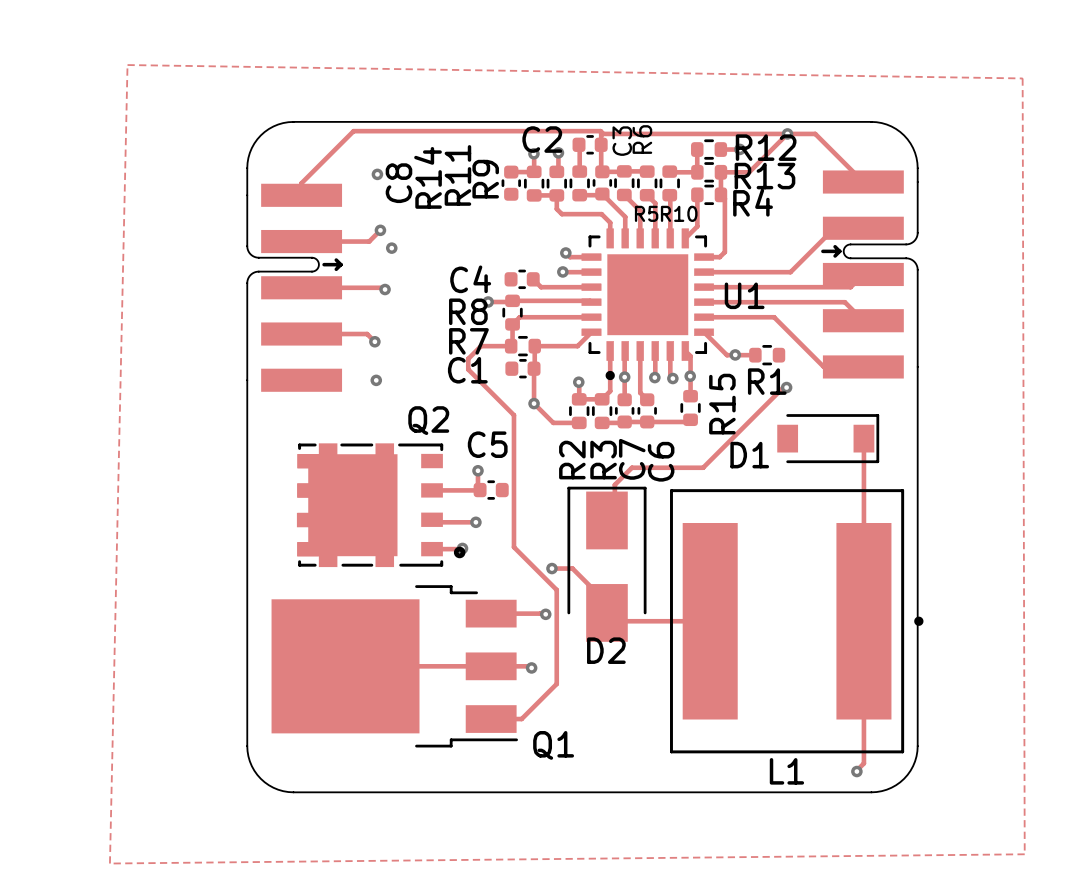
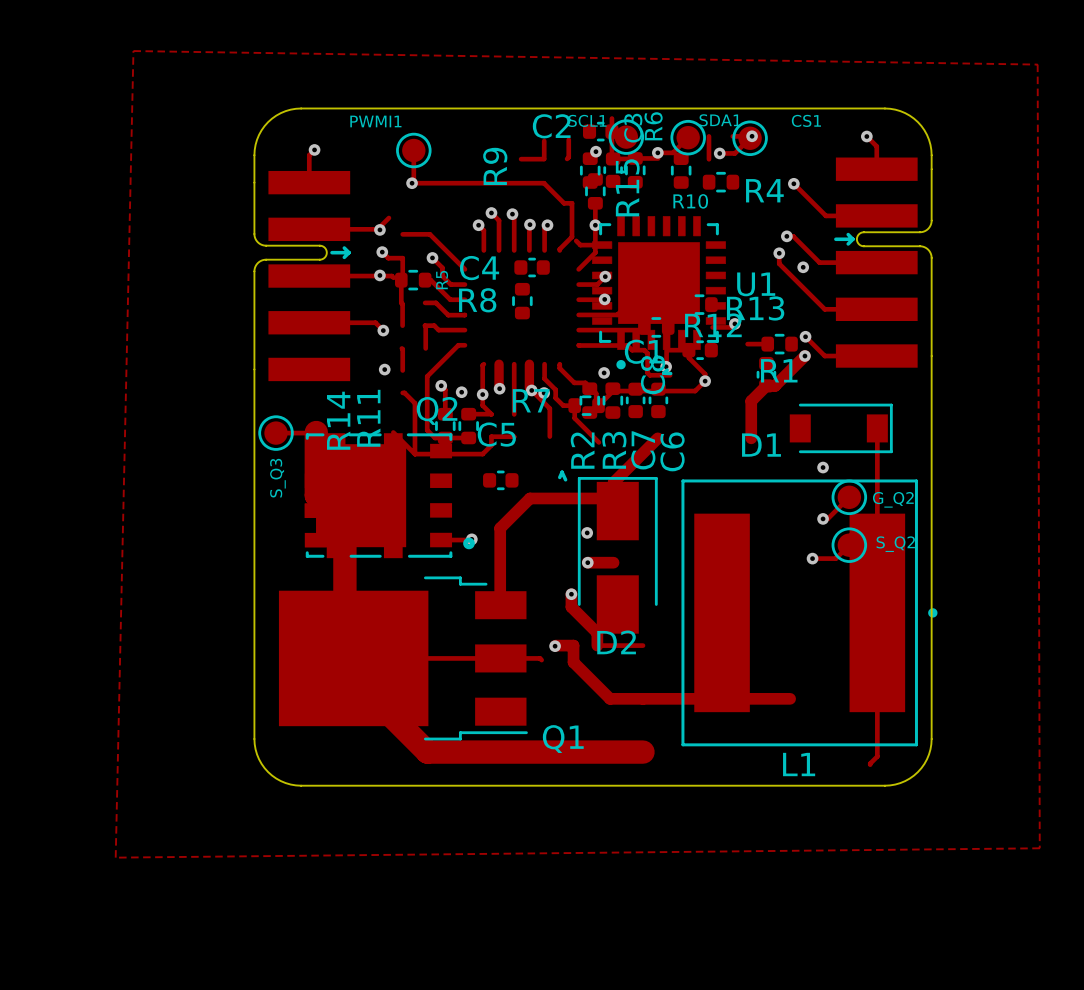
track: (787, 133) (749, 172) (720, 172) (720, 194) (724, 198) (724, 252) (719, 257) (704, 257) -> none
via: (787, 133) -> none
track: (579, 144) (579, 171) -> none
R12 position: (709, 149) -> (656, 327)
via: none -> (866, 136)
SCL1: none -> (626, 137)
track: none -> (688, 137) (673, 152) (657, 152)
SDA1: none -> (688, 137)
track: none -> (750, 138) (734, 153) (719, 153)
CS1: none -> (750, 138)
via: (558, 152) -> none
via: (533, 153) -> none
track: none -> (314, 149) (309, 155) (309, 170)
via: none -> (314, 149)
track: none -> (413, 150) (413, 181) (412, 183) (543, 183) (564, 203) (572, 203) (572, 236) (559, 250)
PWMI1: none -> (413, 150)
via: none -> (595, 151)
via: none -> (657, 152)
via: none -> (719, 153)
track: (669, 171) (697, 172) -> none
R13 position: (709, 172) -> (699, 304)
via: (377, 174) -> none
track: (863, 182) (815, 133) (353, 131) (301, 183) -> (876, 169) (876, 146) (866, 136)
C8 position: (511, 183) -> (766, 374)
R14 position: (534, 183) -> (445, 426)
R11 position: (556, 183) -> (468, 426)
R5 rotation: 0° (647, 183) -> 90° clockwise (413, 280)
R5 position: (647, 183) -> (413, 280)
track: (624, 194) (640, 210) (640, 238) -> none
track: (697, 194) (697, 226) (685, 238) -> none
via: none -> (412, 183)
track: (534, 195) (556, 195) (556, 209) (561, 214) (601, 214) (610, 222) (610, 238) -> none
track: (579, 195) (602, 194) (625, 216) (625, 238) -> none
track: (647, 195) (655, 203) (655, 238) -> none
track: (669, 195) (670, 238) -> none
via: none -> (793, 183)
track: none -> (595, 203) (595, 252) (578, 269)
track: none -> (491, 212) (499, 220) (499, 250)
via: none -> (491, 212)
track: none -> (512, 214) (514, 215) (514, 250)
via: none -> (512, 214)
track: (834, 228) (790, 272) (704, 272) -> (847, 215) (825, 215) (793, 183)
via: (380, 230) -> none
track: none -> (529, 224) (529, 250)
via: none -> (529, 224)
track: none -> (478, 225) (483, 230) (483, 250)
via: none -> (478, 225)
track: none -> (547, 225) (544, 228) (544, 250)
via: none -> (547, 225)
via: none -> (595, 225)
via: none -> (379, 229)
track: none -> (402, 234) (429, 234) (464, 269)
via: (391, 248) -> none
via: none -> (786, 236)
via: (565, 252) -> none
track: none -> (382, 252) (388, 258) (402, 258) (402, 325)
via: none -> (382, 252)
via: none -> (779, 253)
track: none -> (432, 257) (442, 267) (442, 276) (450, 284) (464, 284)
via: none -> (432, 257)
via: (562, 271) -> none
track: (563, 272) (591, 272) -> none
track: (863, 274) (850, 287) (704, 287) -> (876, 262) (819, 262) (793, 236) (786, 236)
track: (533, 279) (541, 287) (591, 287) -> none
via: none -> (803, 267)
via: none -> (379, 275)
track: none -> (605, 276) (597, 284) (578, 284)
via: none -> (605, 276)
via: (385, 289) -> none
track: none -> (425, 280) (430, 280) (450, 299) (464, 299)
track: (488, 301) (591, 302) -> none
via: (488, 301) -> none
track: (704, 302) (844, 302) (863, 320) -> (779, 253) (779, 263) (824, 309) (876, 309)
track: none -> (604, 299) (578, 299)
via: none -> (604, 299)
track: none -> (425, 302) (435, 302) (448, 315) (464, 315)
track: none -> (644, 304) (644, 327) (641, 330) (578, 330)
track: (591, 317) (519, 317) (512, 324) (511, 346) (480, 346) (468, 358) (468, 369) (513, 415) (513, 547) (556, 589) (556, 683) (521, 719) (491, 719) -> none
track: (704, 317) (774, 317) (823, 366) -> (805, 336) (824, 356) (836, 356)
track: none -> (622, 309) (617, 314) (578, 314)
track: (591, 332) (577, 346) (534, 346) (534, 403) (553, 422) (579, 422) -> none
track: (704, 332) (726, 355) (735, 355) -> none
track: none -> (734, 323) (731, 327) (712, 327)
track: none -> (464, 330) (438, 330) (434, 325) (425, 325) (425, 348)
R7 position: (522, 346) -> (586, 405)
via: none -> (805, 336)
track: (610, 351) (610, 391) (602, 399) (579, 399) (578, 382) -> none
track: (625, 351) (624, 399) -> none
track: (640, 351) (640, 392) (647, 399) -> none
track: (670, 351) (670, 375) (672, 378) -> none
track: (685, 351) (690, 356) (690, 396) -> none
via position: (735, 354) -> (734, 323)
track: none -> (464, 345) (458, 345) (427, 376) (427, 430) (435, 437) (468, 437)
track: none -> (578, 345) (627, 345) (632, 350) (644, 350) (647, 353) (647, 372) (649, 375) (670, 375)
track: none -> (401, 348) (402, 370)
track: none -> (668, 350) (688, 350) (688, 357) (705, 374) (705, 381) (695, 391) (613, 391) (598, 405)
track: none -> (804, 356) (775, 385) (766, 385) (751, 401) (751, 438)
via: none -> (804, 356)
C1 position: (522, 368) -> (700, 350)
track: none -> (483, 364) (482, 405) (491, 414) (468, 414)
track: none -> (499, 364) (499, 388)
track: none -> (514, 364) (514, 414)
track: none -> (529, 364) (529, 388) (549, 408) (549, 436)
track: none -> (544, 364) (544, 378) (555, 389) (555, 398) (563, 405) (574, 405) (574, 418) (598, 442)
track: none -> (559, 364) (559, 368) (574, 382) (585, 382) (596, 393) (596, 404)
via: (690, 376) -> none
via: (624, 377) -> none
via: (672, 378) -> none
line: none -> (667, 370) (663, 373) (670, 373)
via position: (578, 382) -> (604, 372)
track: (786, 387) (783, 387) (703, 467) (631, 467) (614, 484) (614, 518) -> none
via: (786, 387) -> none
via: none -> (705, 381)
track: none -> (441, 385) (445, 389) (445, 414)
via: none -> (441, 385)
via: none -> (499, 388)
via: none -> (531, 390)
via: none -> (461, 392)
track: none -> (402, 392) (414, 403) (414, 454)
via: none -> (482, 394)
R15 position: (690, 407) -> (595, 191)
track: (690, 419) (688, 421) (602, 422) -> none
track: none -> (393, 432) (414, 454)
track: none -> (276, 433) (316, 432) (316, 495) (344, 524) (344, 669) (427, 752) (643, 752)
S_Q3: none -> (276, 433)
track: none -> (514, 436) (491, 436) (491, 445) (482, 454) (414, 454)
track: none -> (657, 438) (613, 482) (613, 503) (608, 498) (529, 498) (500, 528) (500, 598)
track: (477, 470) (477, 487) (479, 490) (432, 490) -> none
via: (477, 470) -> none
via: none -> (823, 467)
line: none -> (559, 477) (562, 472) (565, 479)
track: none -> (849, 497) (827, 518) (823, 518)
G_Q2: none -> (849, 497)
track: (432, 519) (434, 522) (475, 522) -> none
via: (475, 522) -> none
via: none -> (823, 518)
via: none -> (587, 532)
track: none -> (849, 545) (835, 558) (812, 558)
S_Q2: none -> (849, 545)
via: none -> (812, 558)
track: (551, 568) (572, 568) (625, 621) (710, 621) -> none
via: (551, 568) -> none
track: none -> (587, 562) (613, 562)
via: none -> (587, 562)
track: none -> (571, 594) (571, 607) (597, 632) (597, 645) (643, 645)
via: none -> (571, 594)
track: (491, 613) (545, 614) (540, 613) -> none
via: (545, 614) -> none
track: none -> (555, 646) (573, 645) (573, 662) (610, 698) (790, 698)
via position: (531, 667) -> (555, 646)
via: (856, 771) -> none

